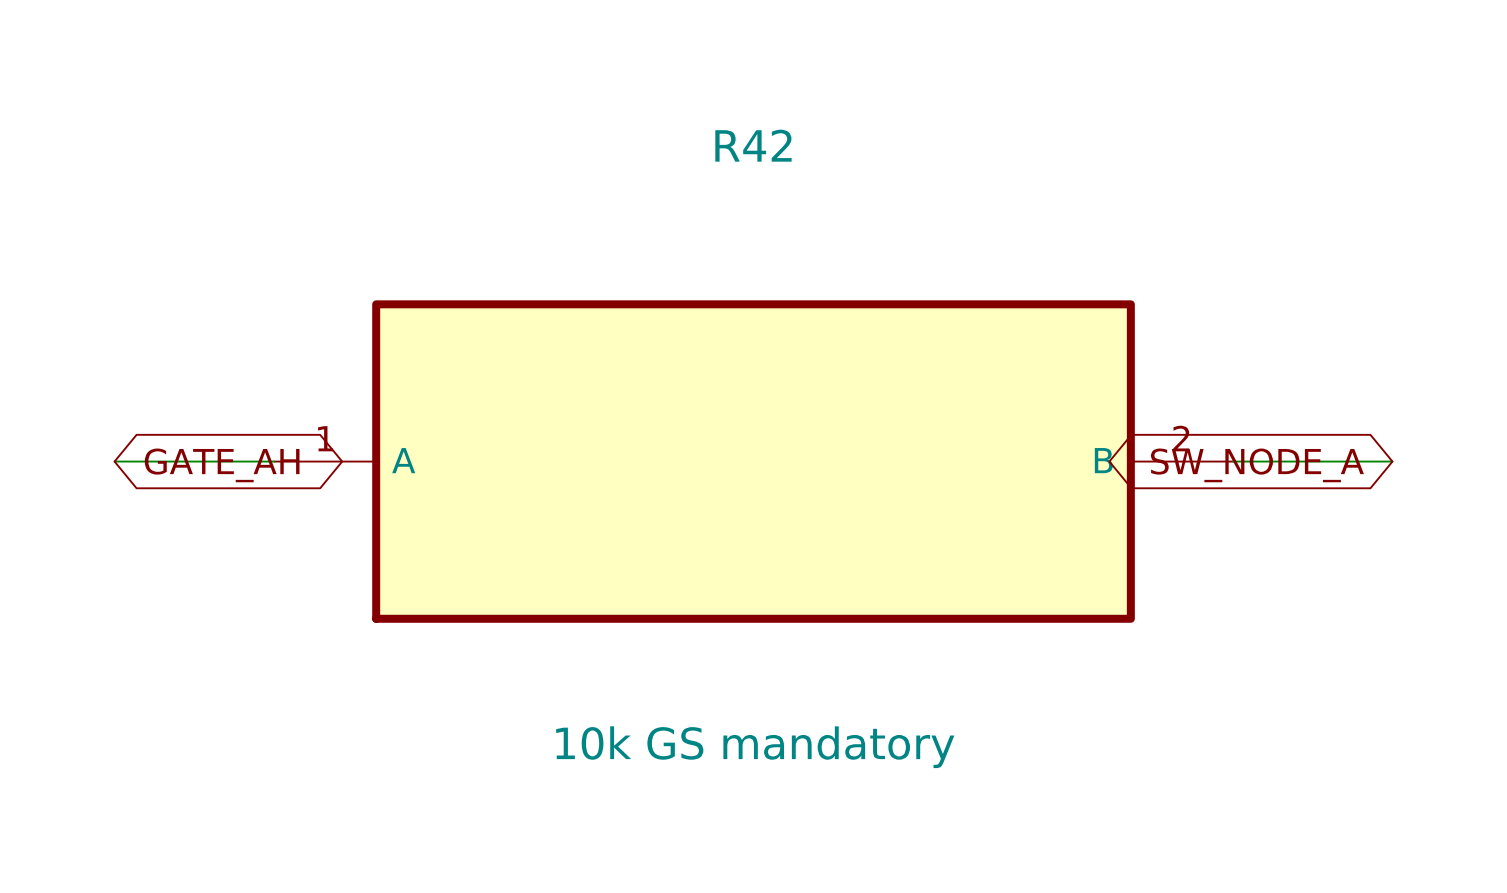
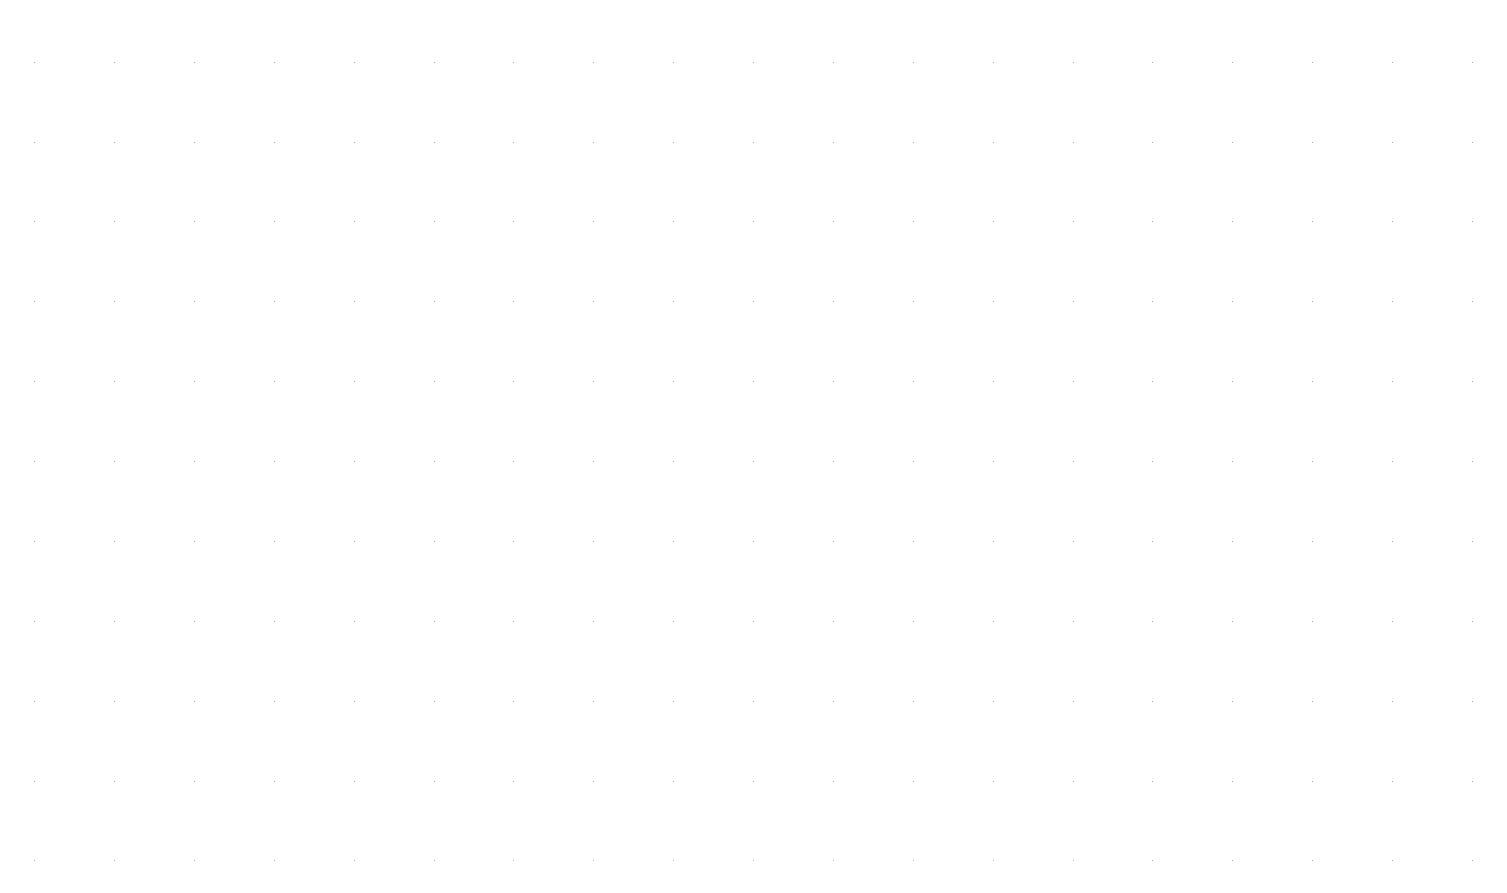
wire: (114, 461) (274, 461) -> none
R42: 10k GS mandatory (753, 461) -> none
wire: (1232, 461) (1392, 461) -> none
global label: GATE_AH (222, 465) -> none
global label: SW_NODE_A (1257, 465) -> none

